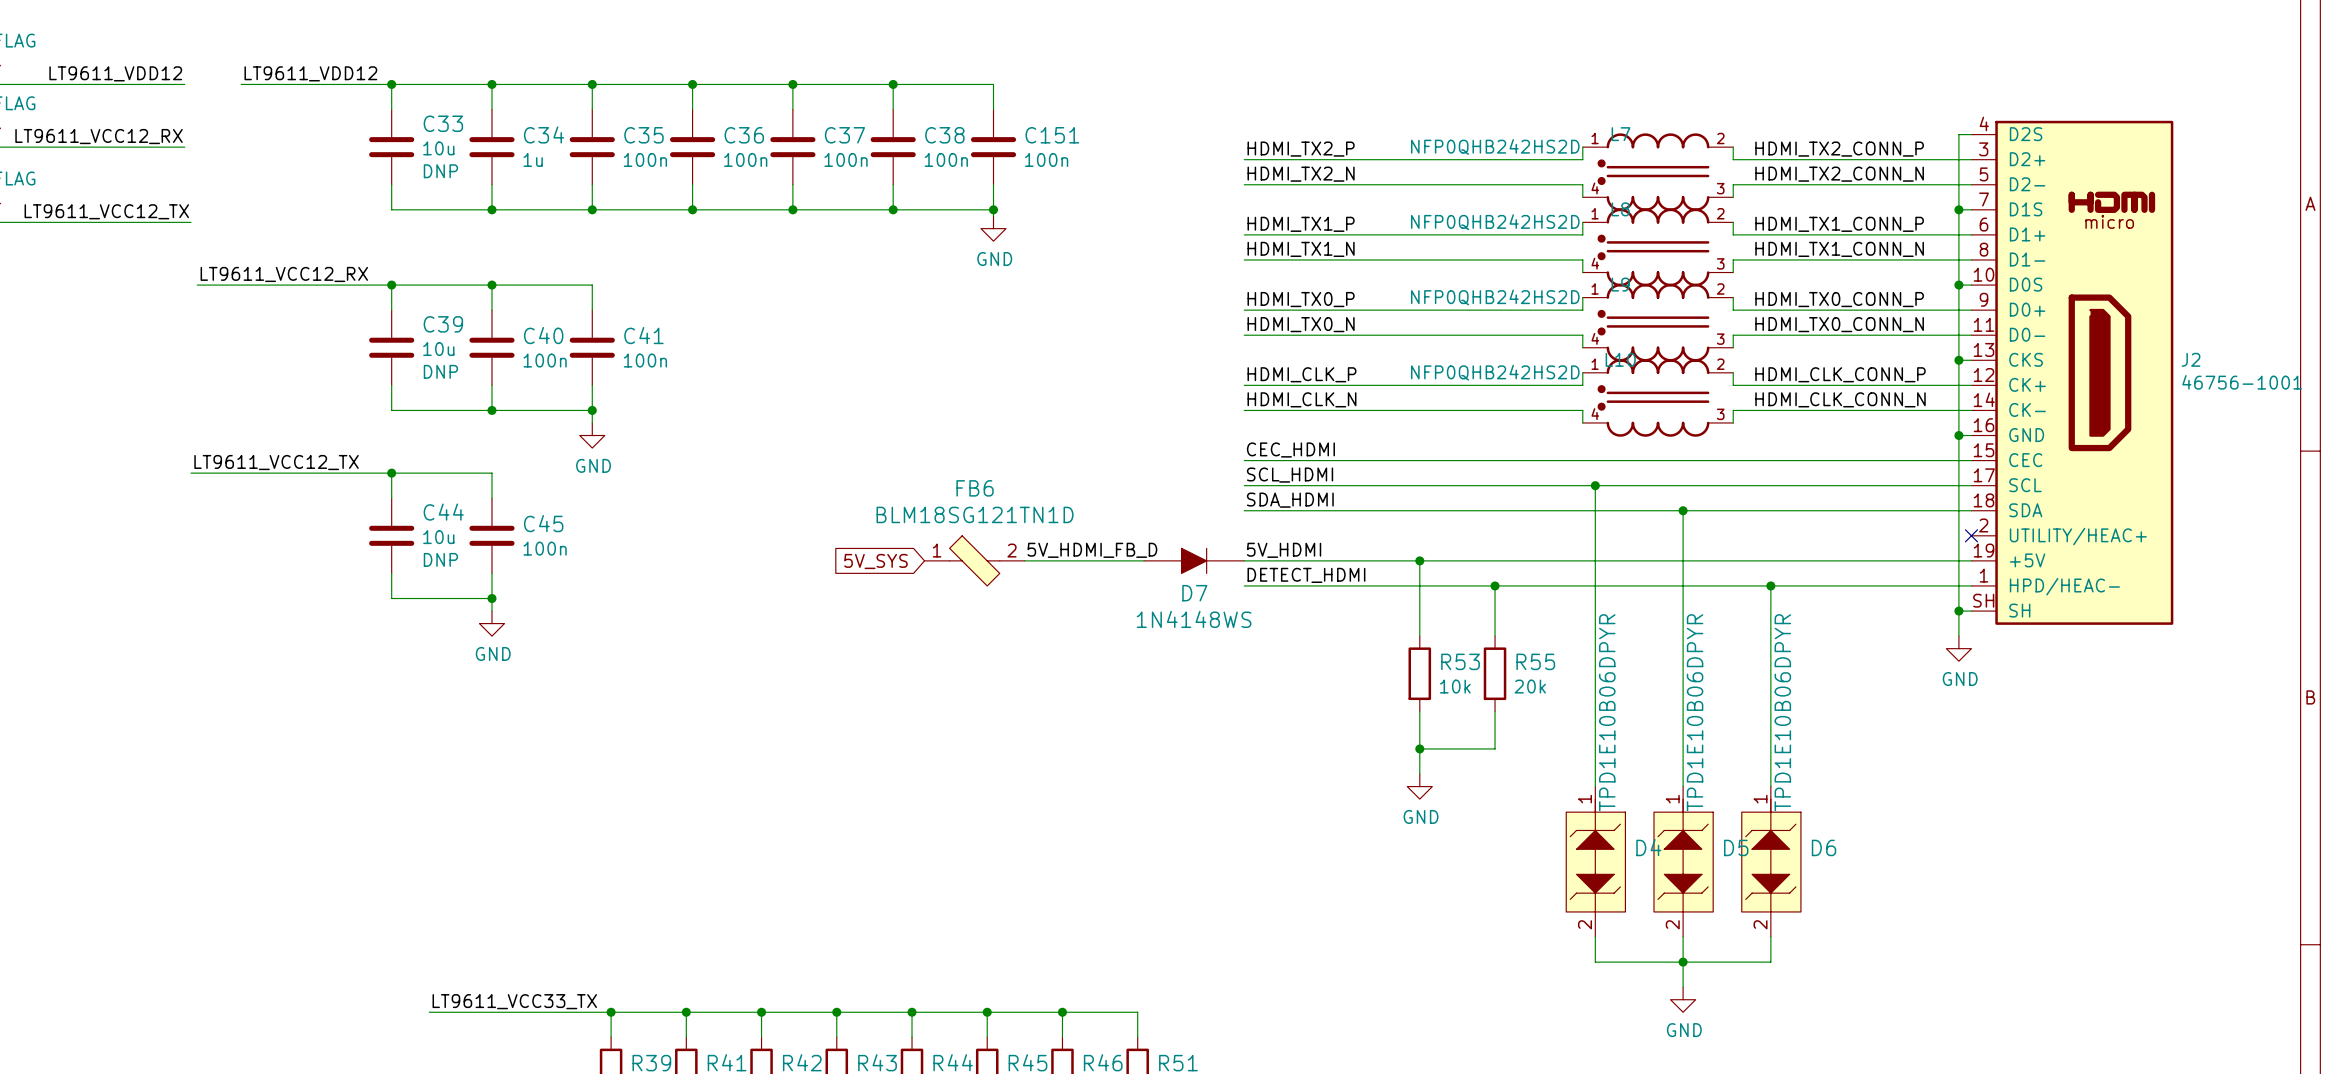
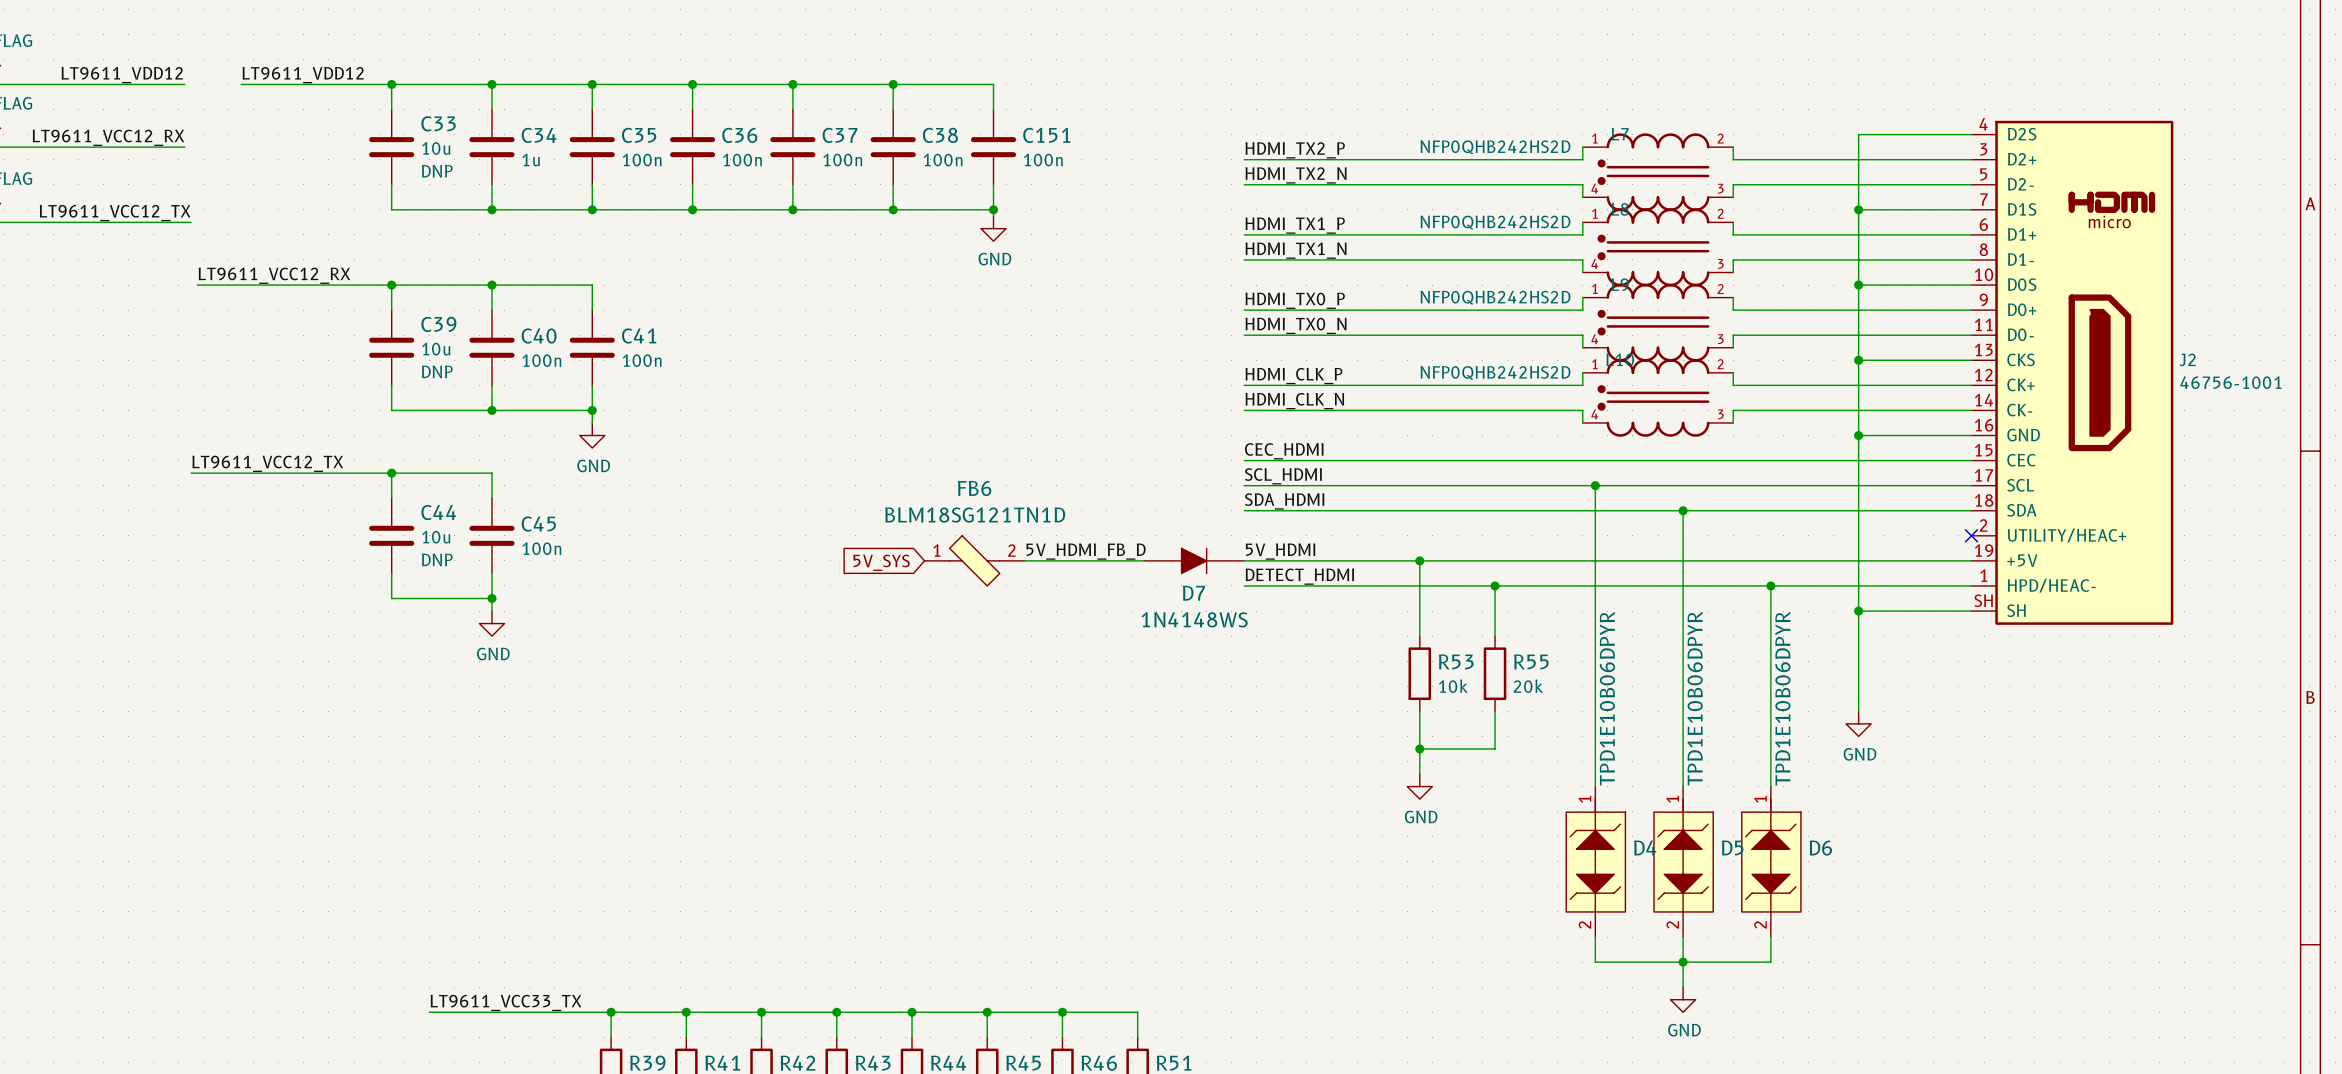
wire: (1958, 134) (1958, 636) -> (1958, 134) (1858, 134) (1858, 711)
label: HDMI_TX2_CONN_P (1839, 149) -> none
label: HDMI_TX2_CONN_N (1839, 174) -> none
wire: none -> (1858, 209) (1958, 209)
junction: none -> (1858, 209)
junction: (1958, 209) -> none
label: HDMI_TX1_CONN_P (1839, 224) -> none
label: HDMI_TX1_CONN_N (1839, 249) -> none
wire: none -> (1858, 285) (1958, 285)
junction: none -> (1858, 285)
junction: (1958, 285) -> none
label: HDMI_TX0_CONN_P (1839, 299) -> none
label: HDMI_TX0_CONN_N (1839, 324) -> none
wire: none -> (1858, 360) (1958, 360)
junction: none -> (1858, 360)
junction: (1958, 360) -> none
label: HDMI_CLK_CONN_P (1840, 374) -> none
label: HDMI_CLK_CONN_N (1840, 399) -> none
wire: none -> (1858, 435) (1958, 435)
junction: none -> (1858, 435)
junction: (1958, 435) -> none
wire: none -> (1858, 611) (1958, 611)
junction: none -> (1858, 611)
junction: (1958, 611) -> none
power symbol position: GND (1958, 648) -> GND (1858, 723)

